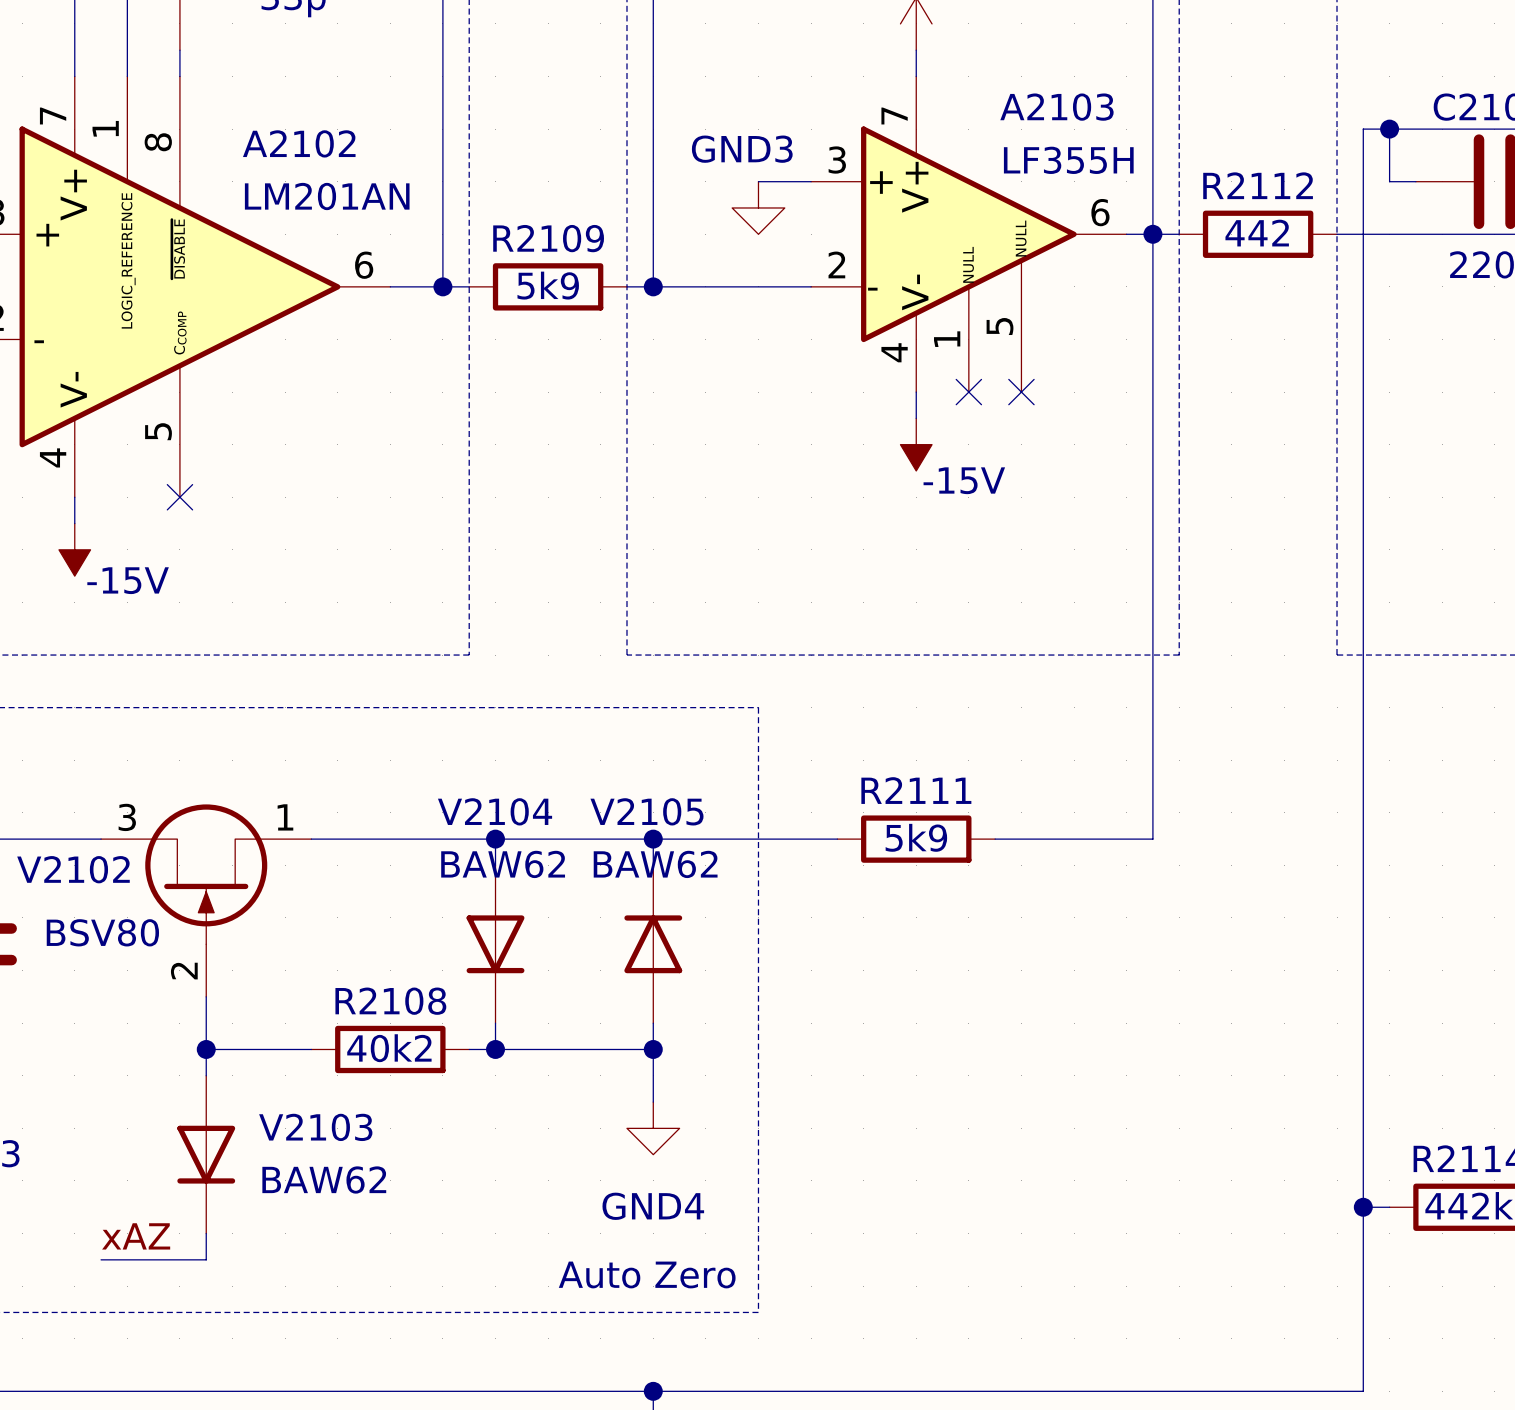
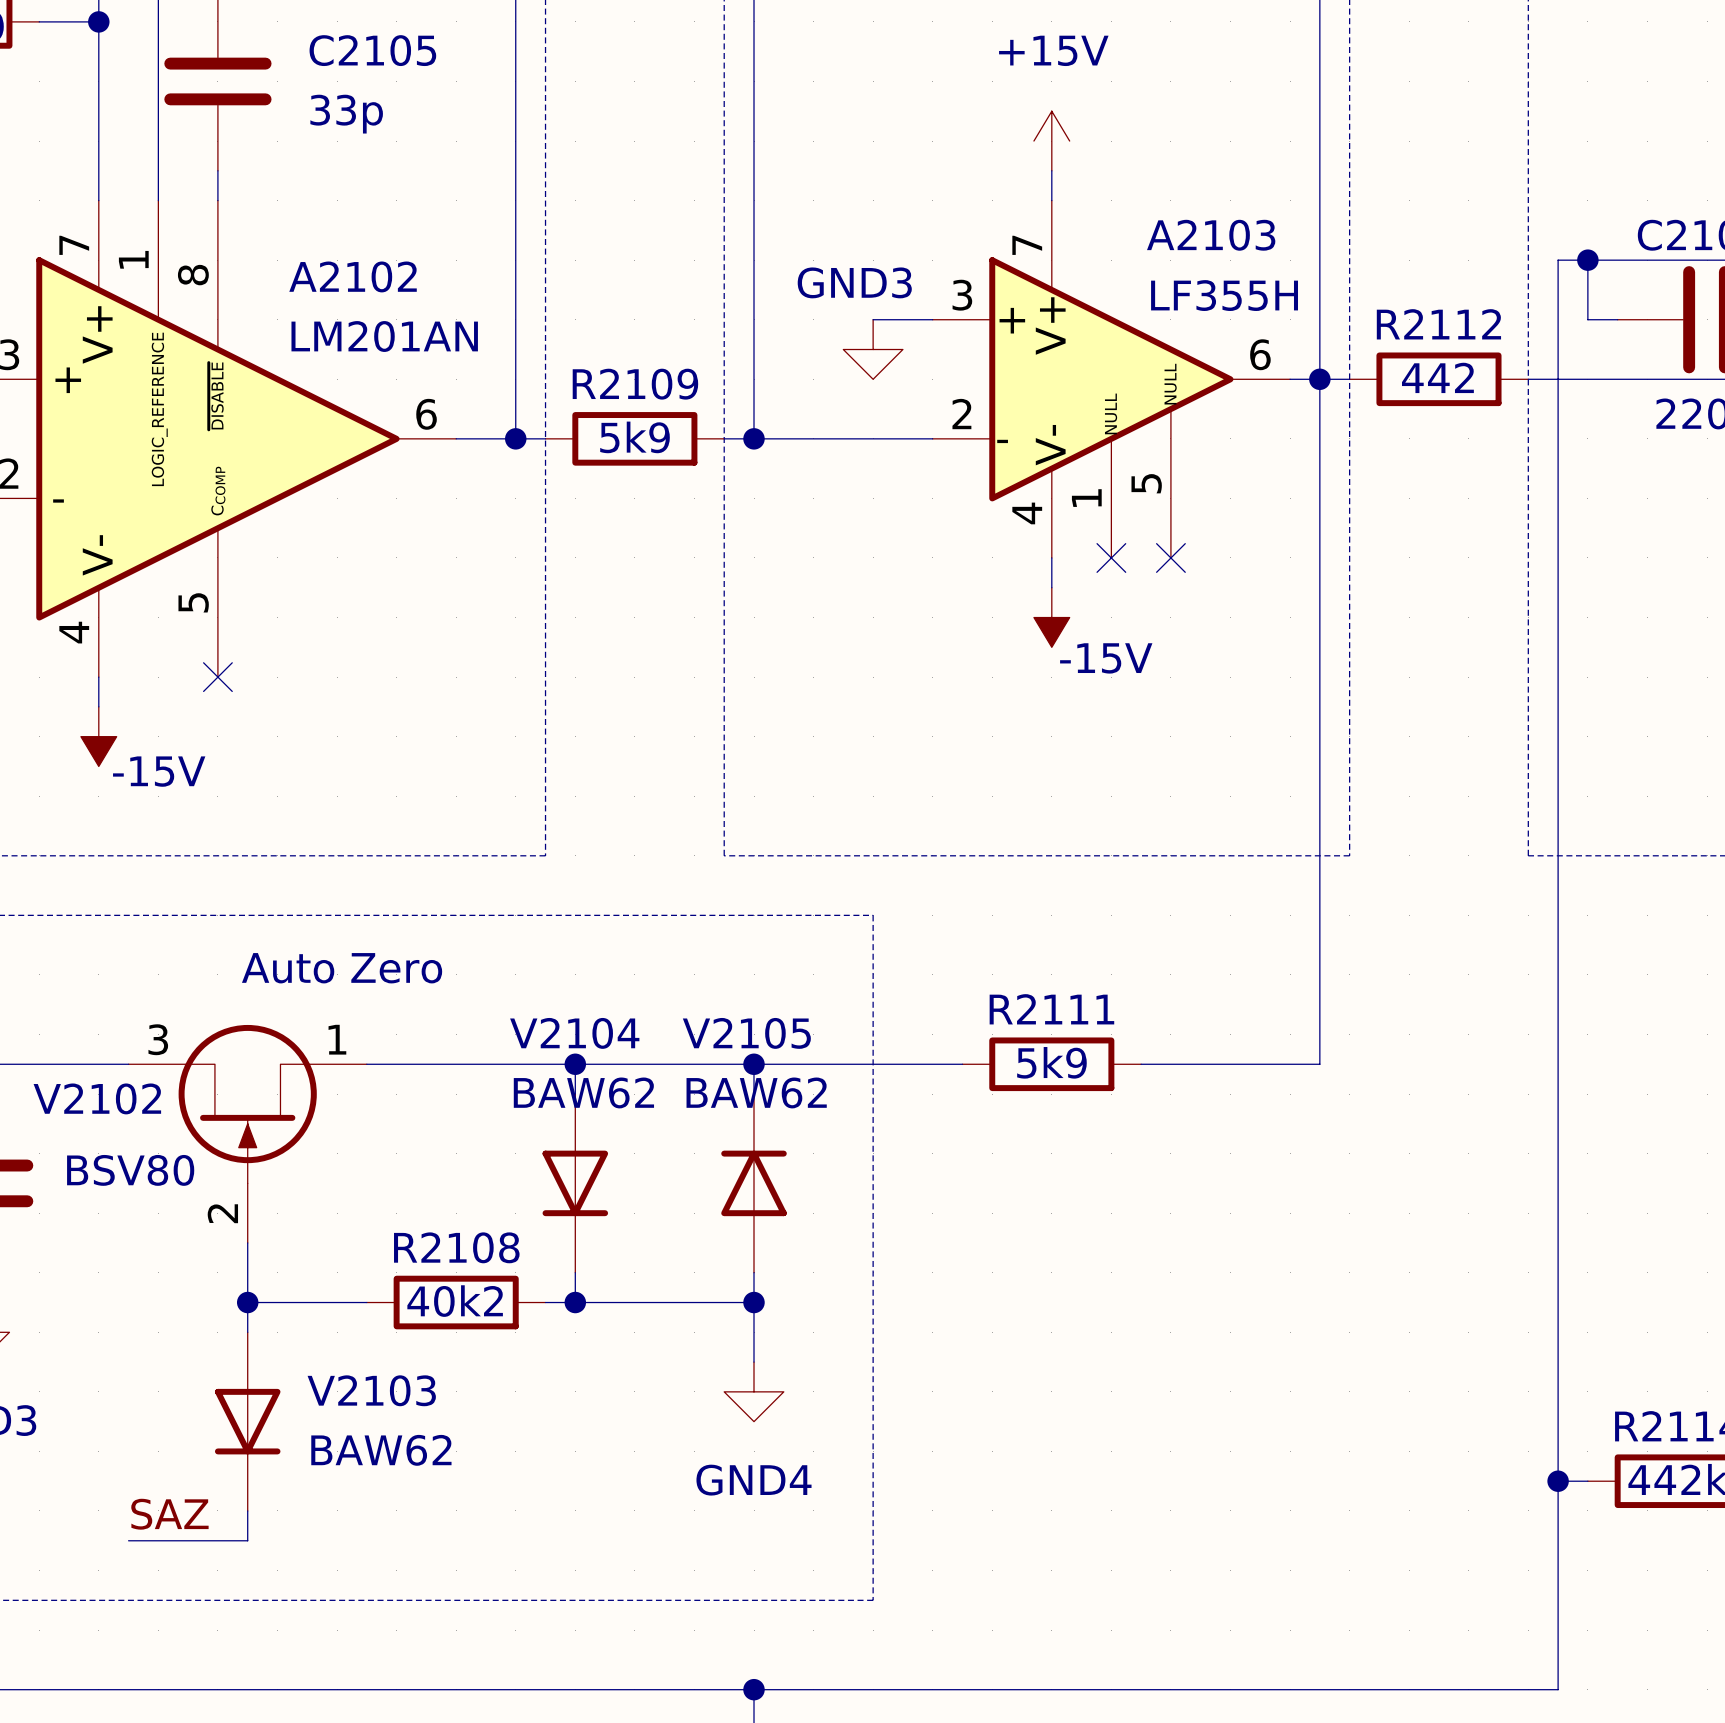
text: none -> Auto Zero (342, 968)
label: xAZ (136, 1236) -> SAZ (169, 1514)
text: Auto Zero (647, 1274) -> none

